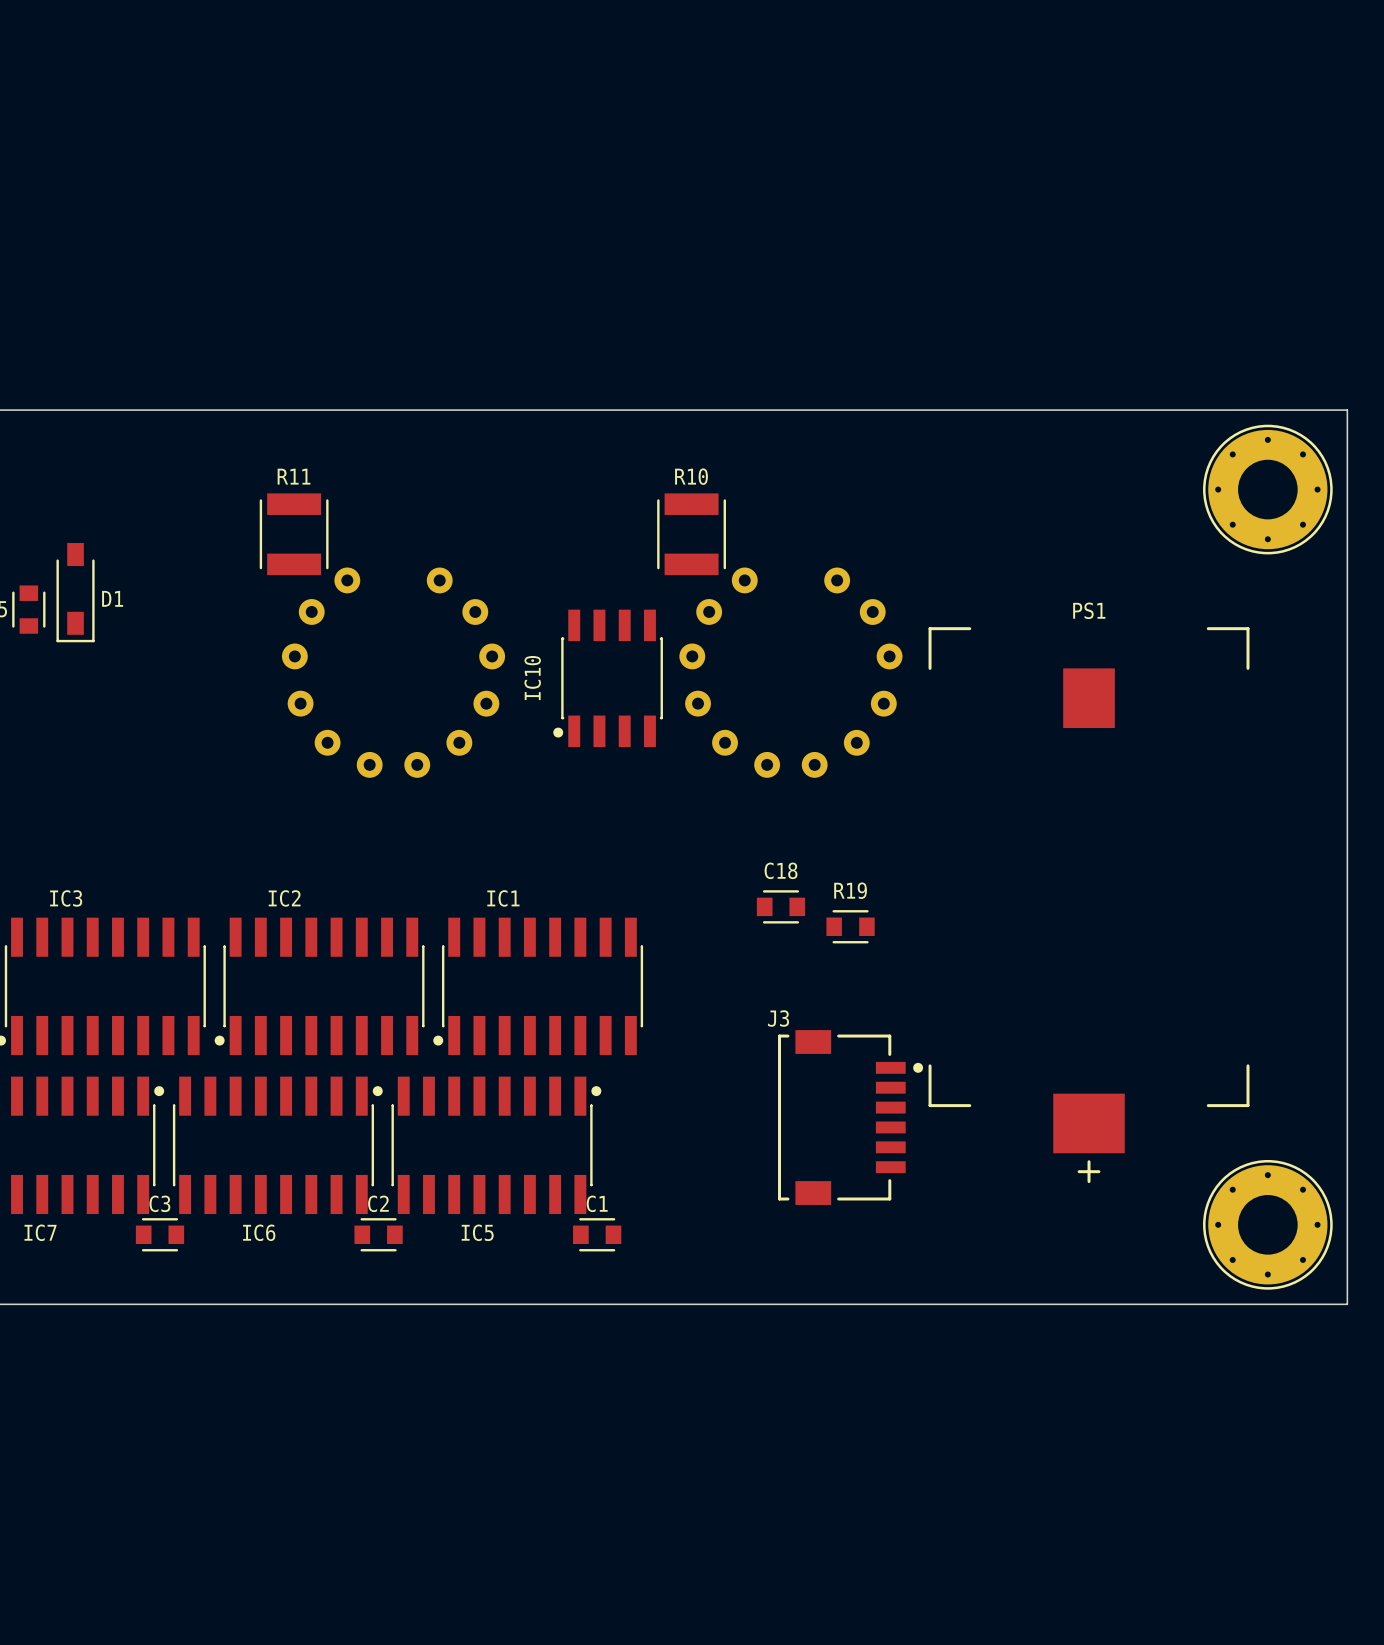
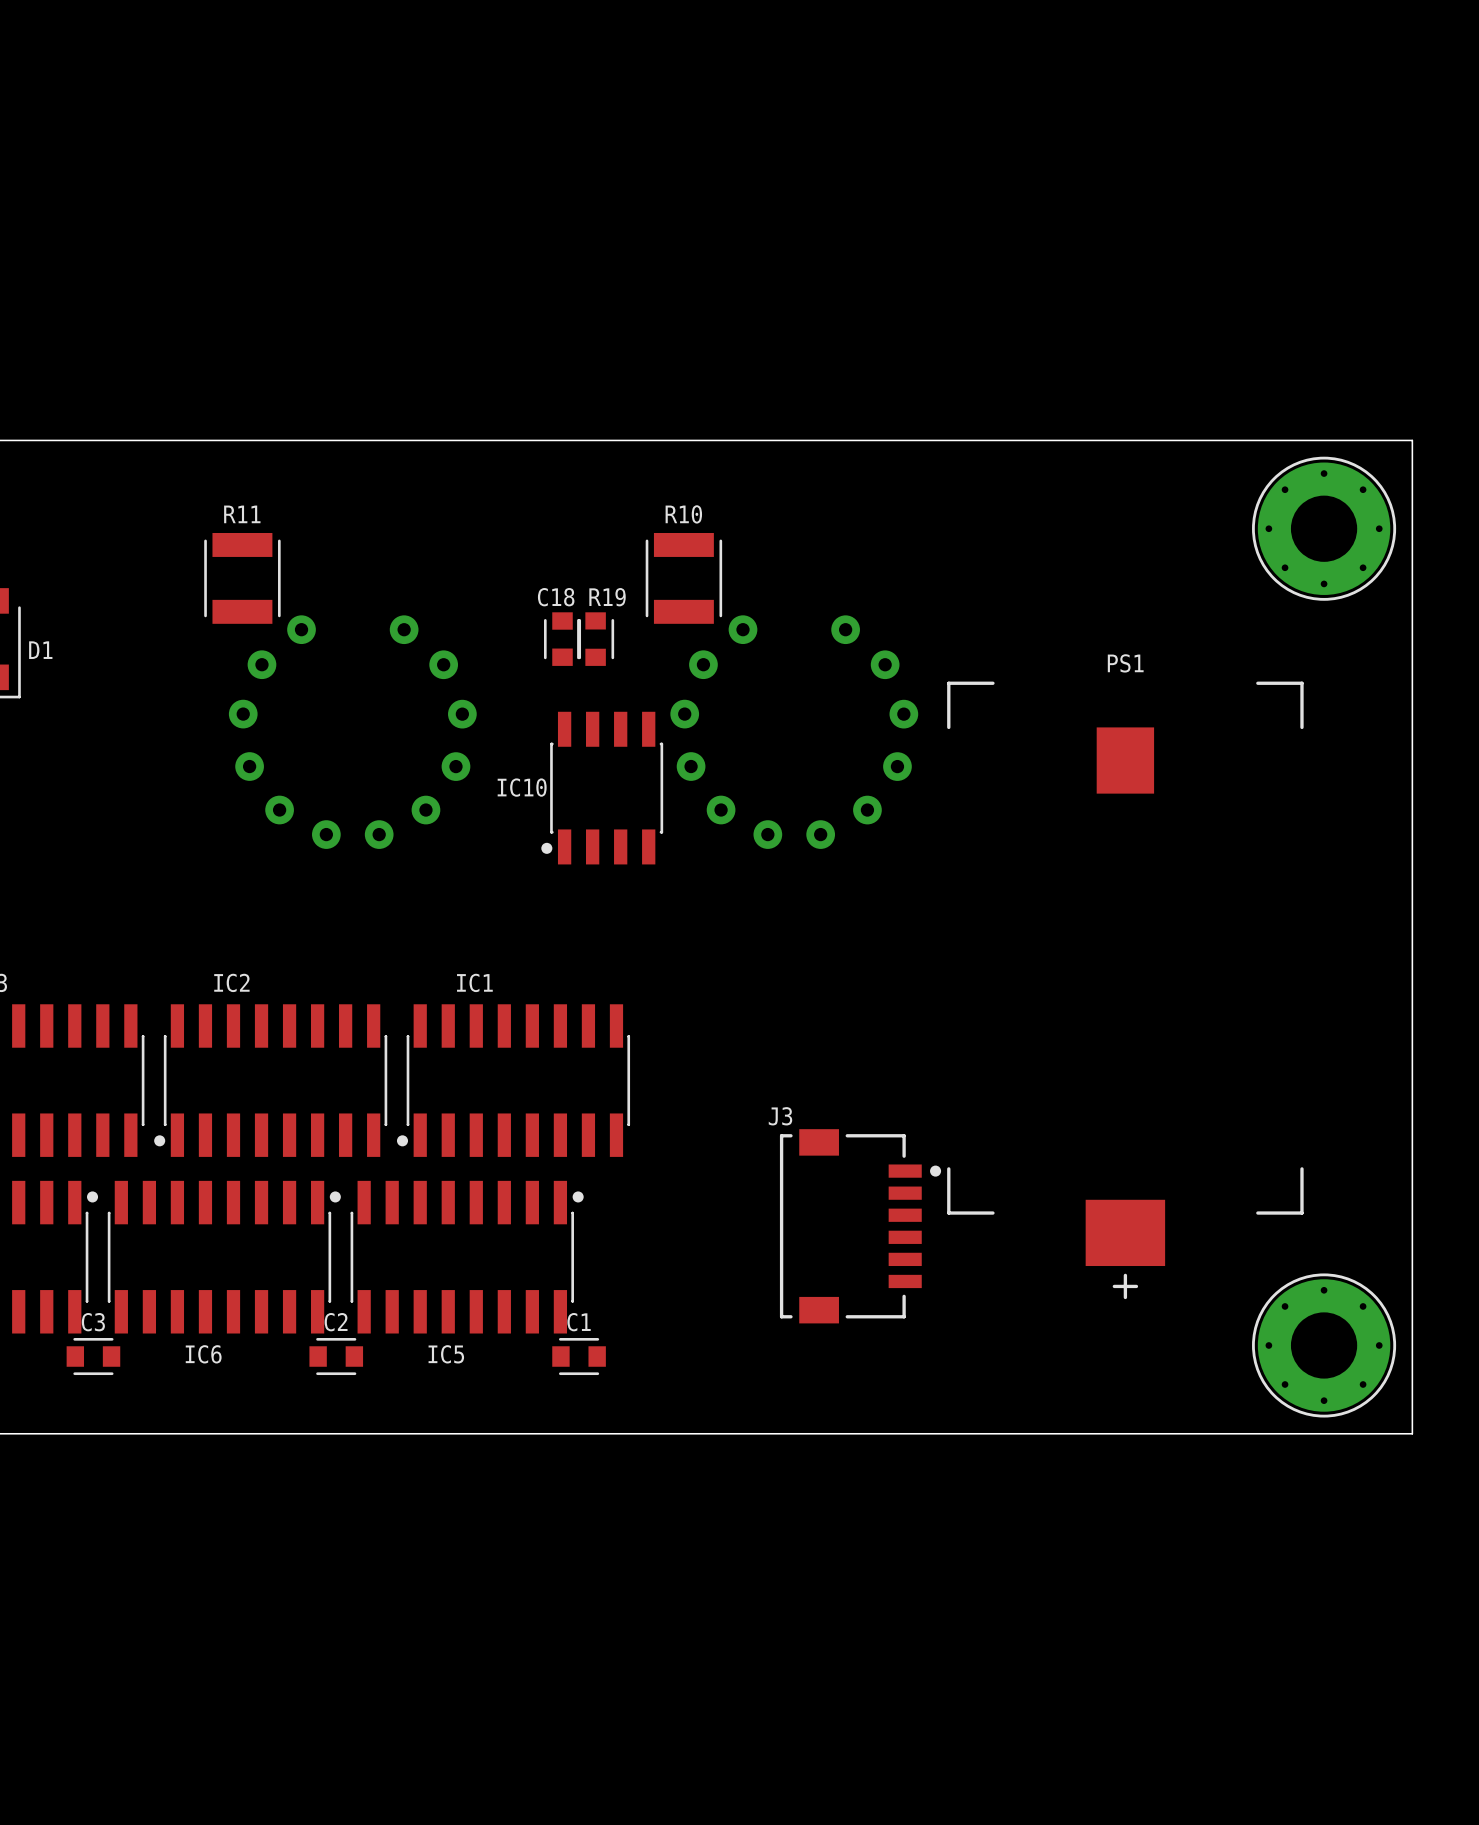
IC10 name rotation: 0° (532, 678) -> 90° clockwise (522, 787)
IC10 position: (608, 678) -> (602, 788)
C18 rotation: 0° (781, 906) -> 90° clockwise (562, 639)
C18 position: (781, 906) -> (562, 639)
R19 rotation: 0° (850, 926) -> 90° clockwise (595, 639)
R19 position: (850, 926) -> (595, 639)

